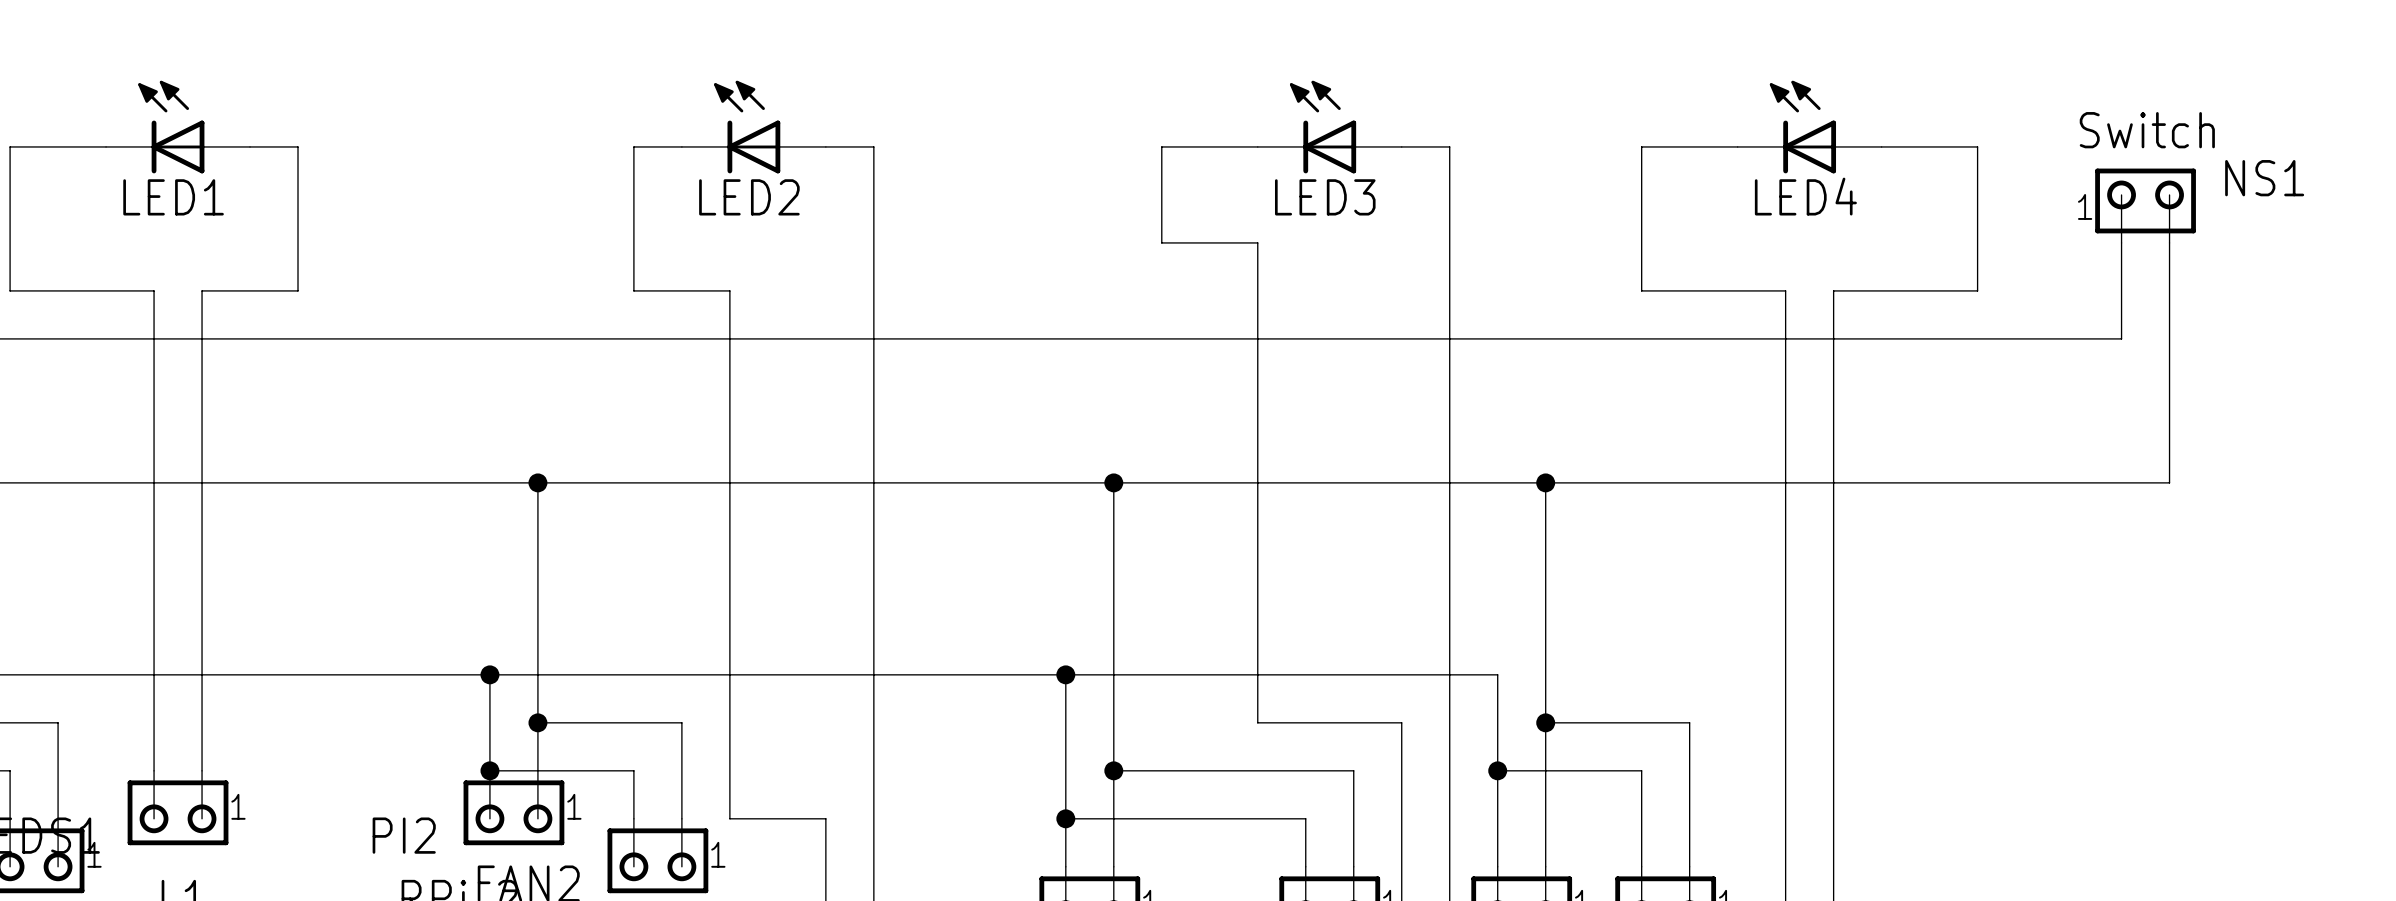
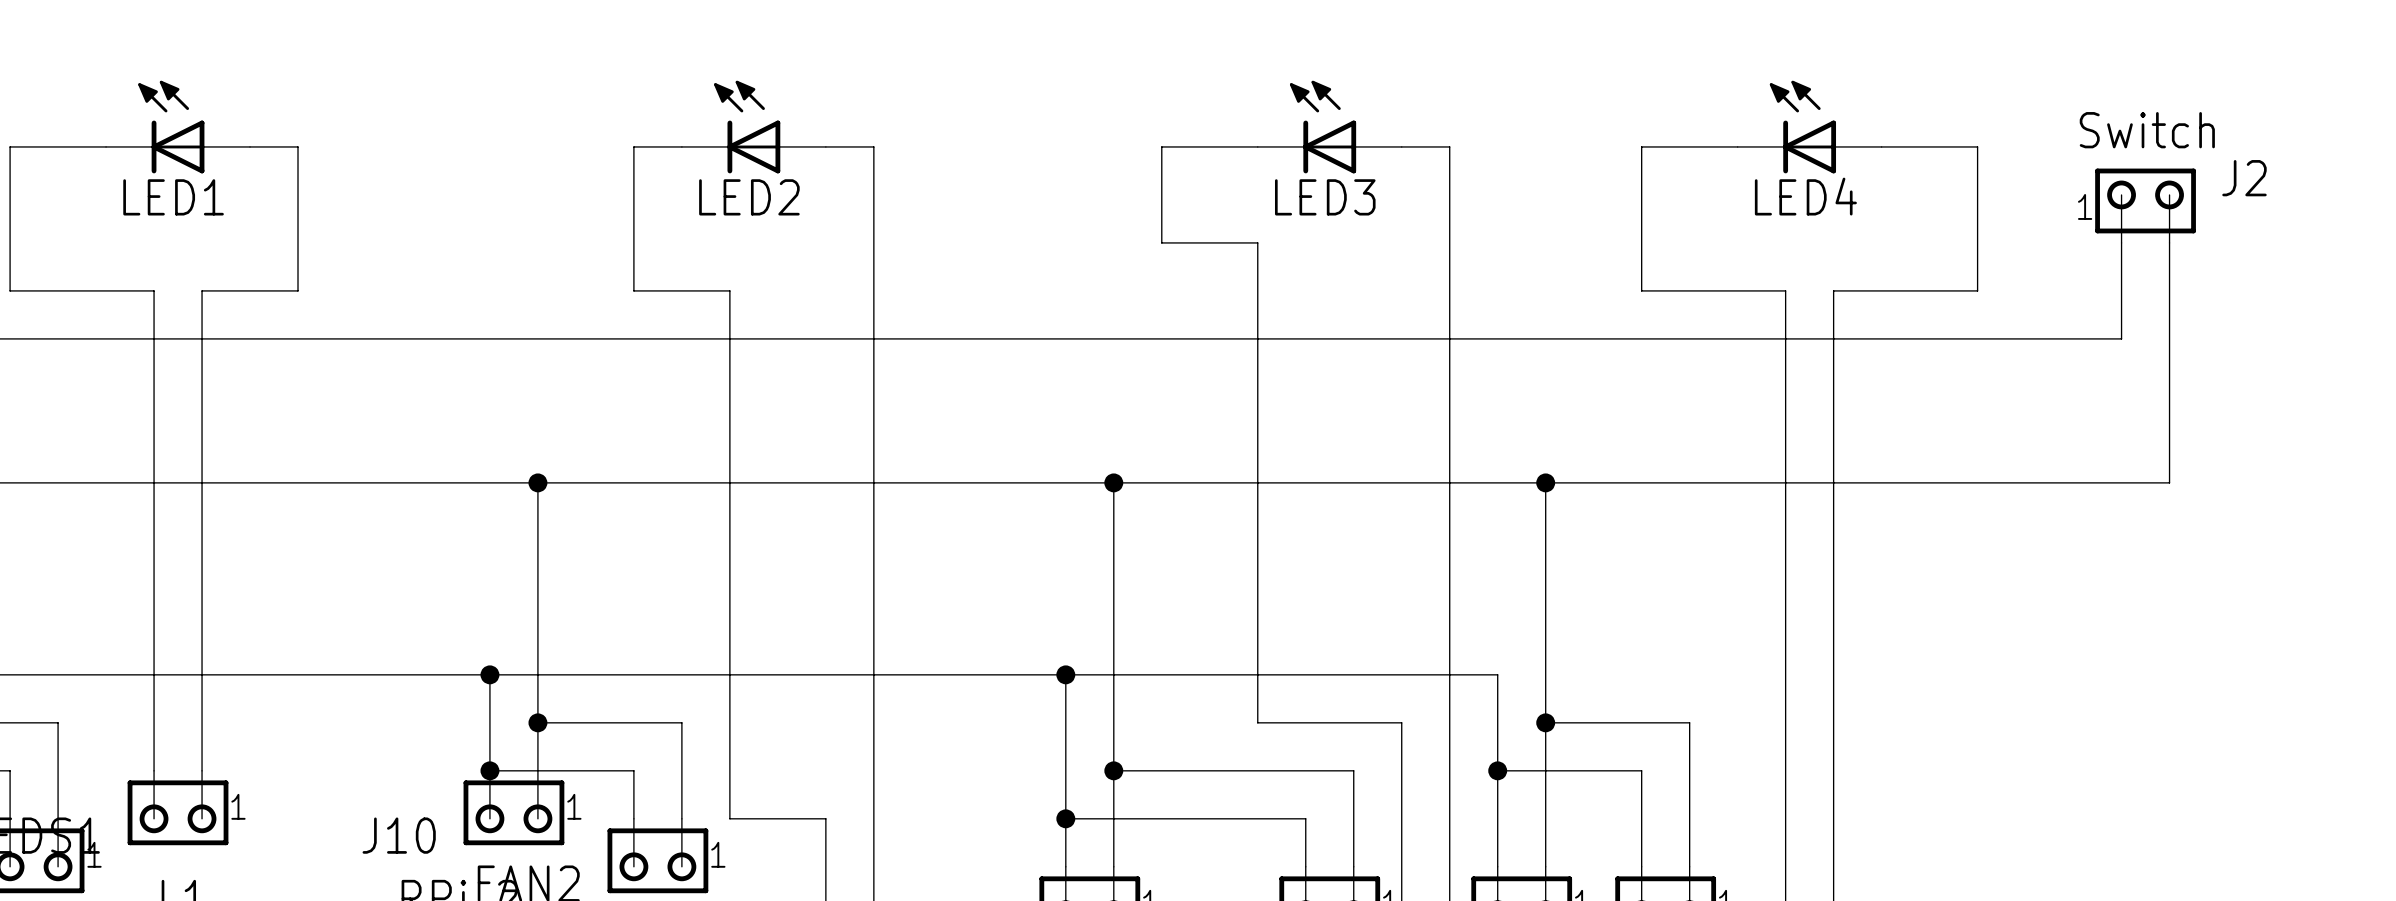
NS1 name: NS1 (2264, 178) -> J2 (2244, 178)
PI2 name: PI2 (404, 835) -> J10 (399, 835)

